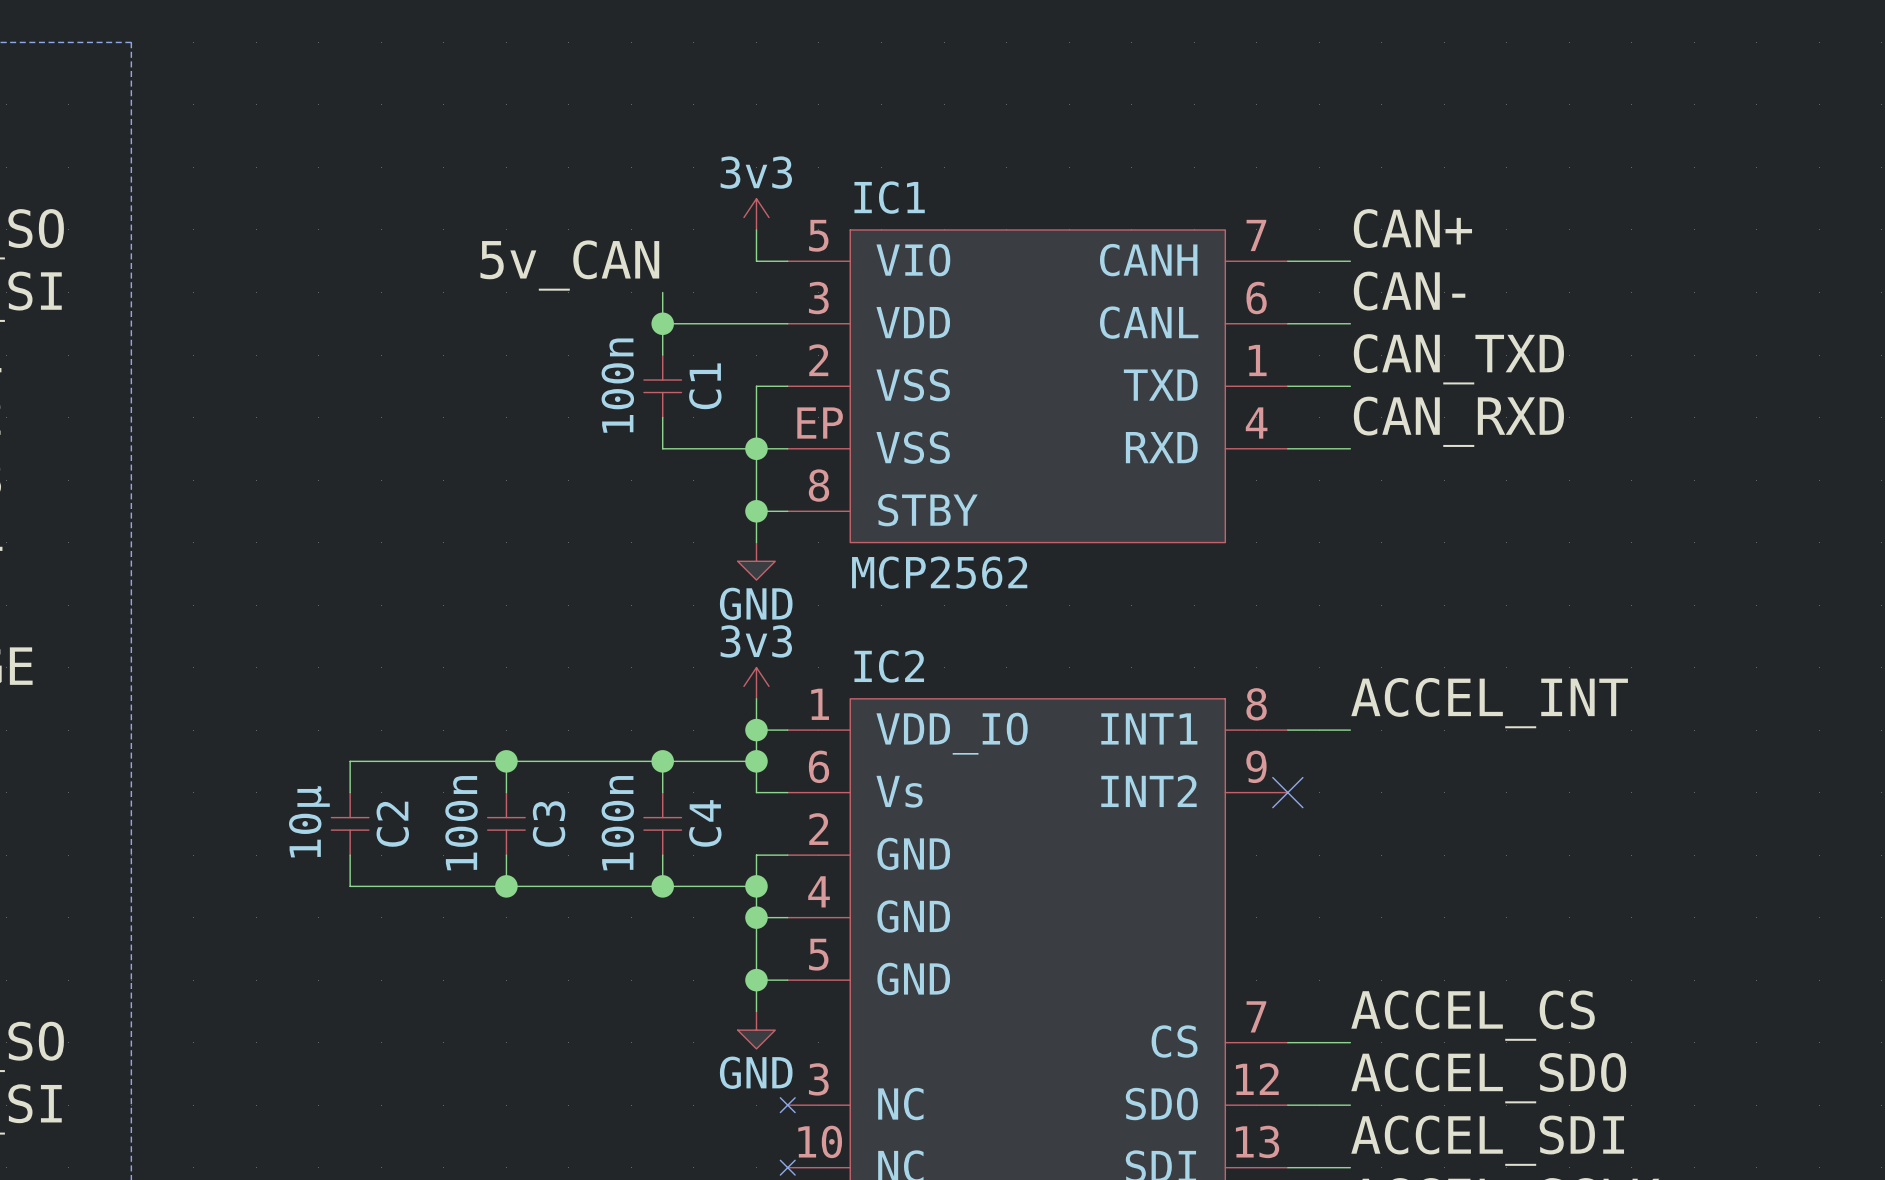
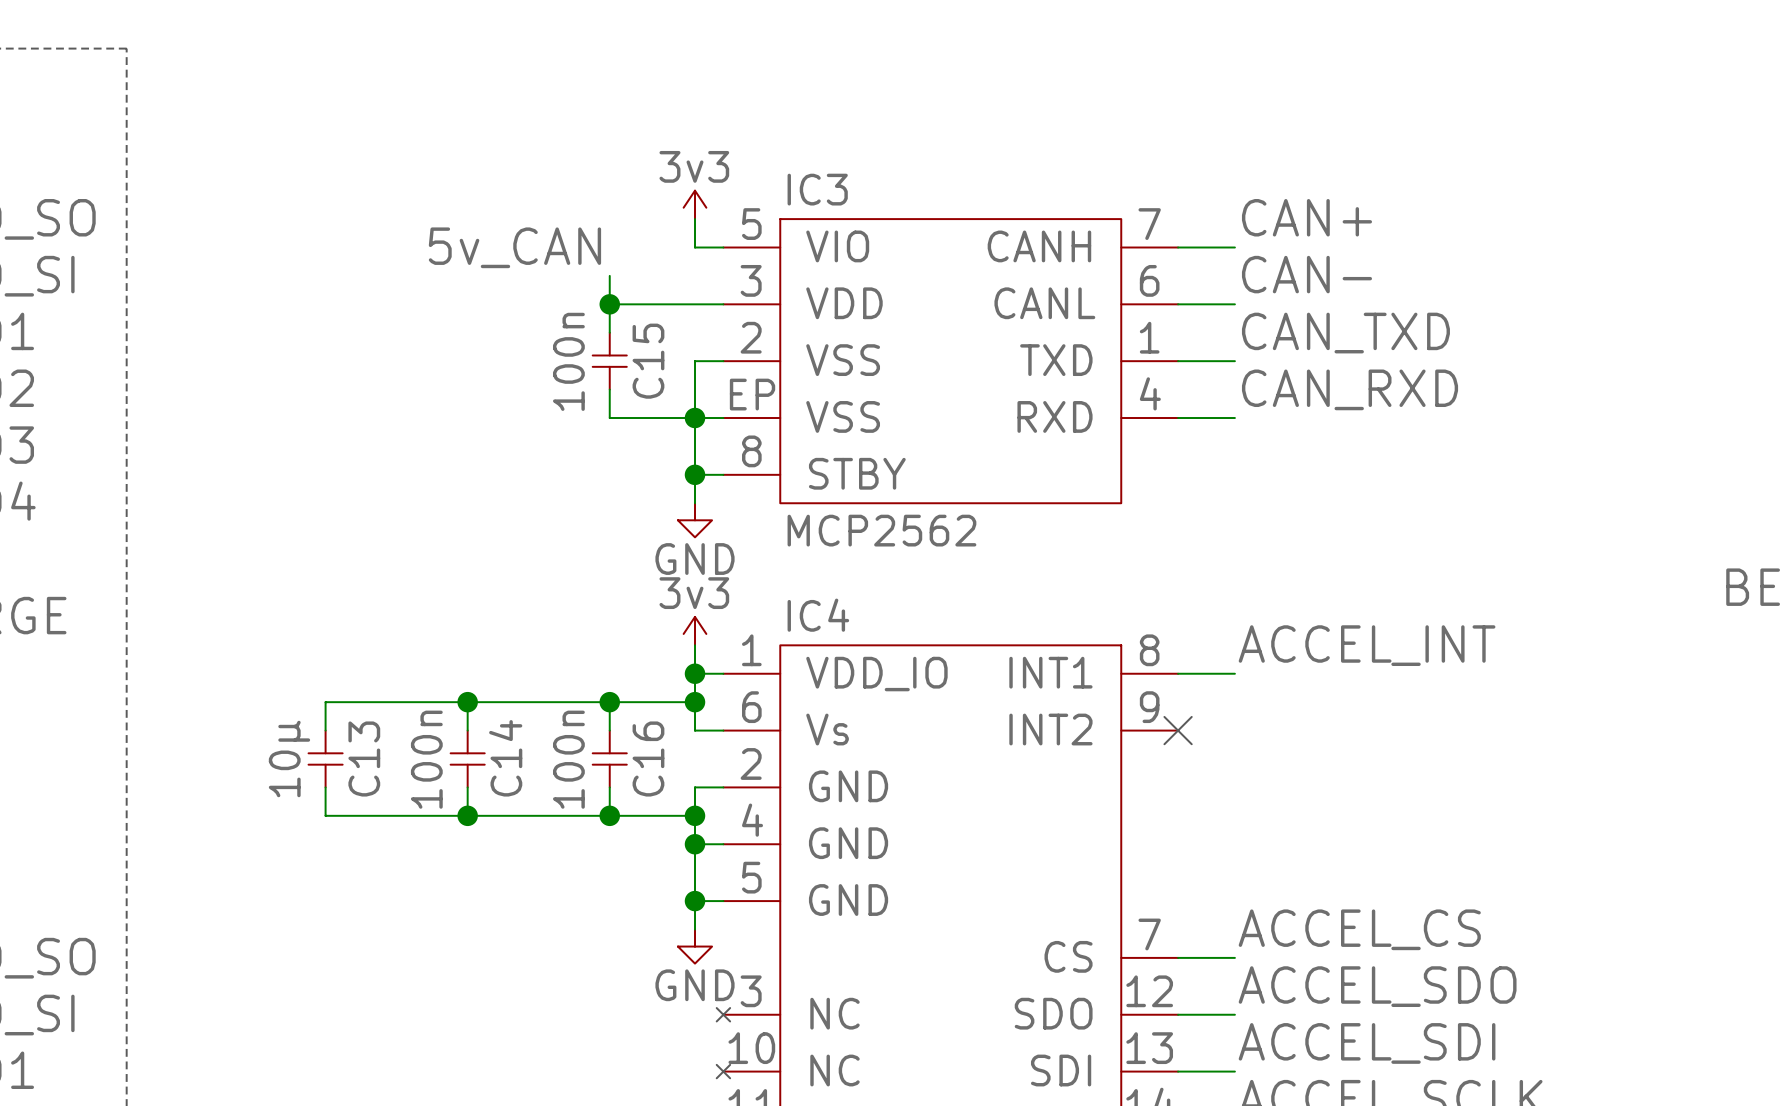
IC1 name: IC1 (889, 197) -> IC3 (817, 189)
C1 name: C1 (705, 386) -> C15 (648, 361)
IC2 name: IC2 (889, 666) -> IC4 (818, 615)
C4 name: C4 (705, 823) -> C16 (648, 759)
C2 name: C2 (392, 824) -> C13 (364, 759)
C3 name: C3 (549, 824) -> C14 (505, 758)

